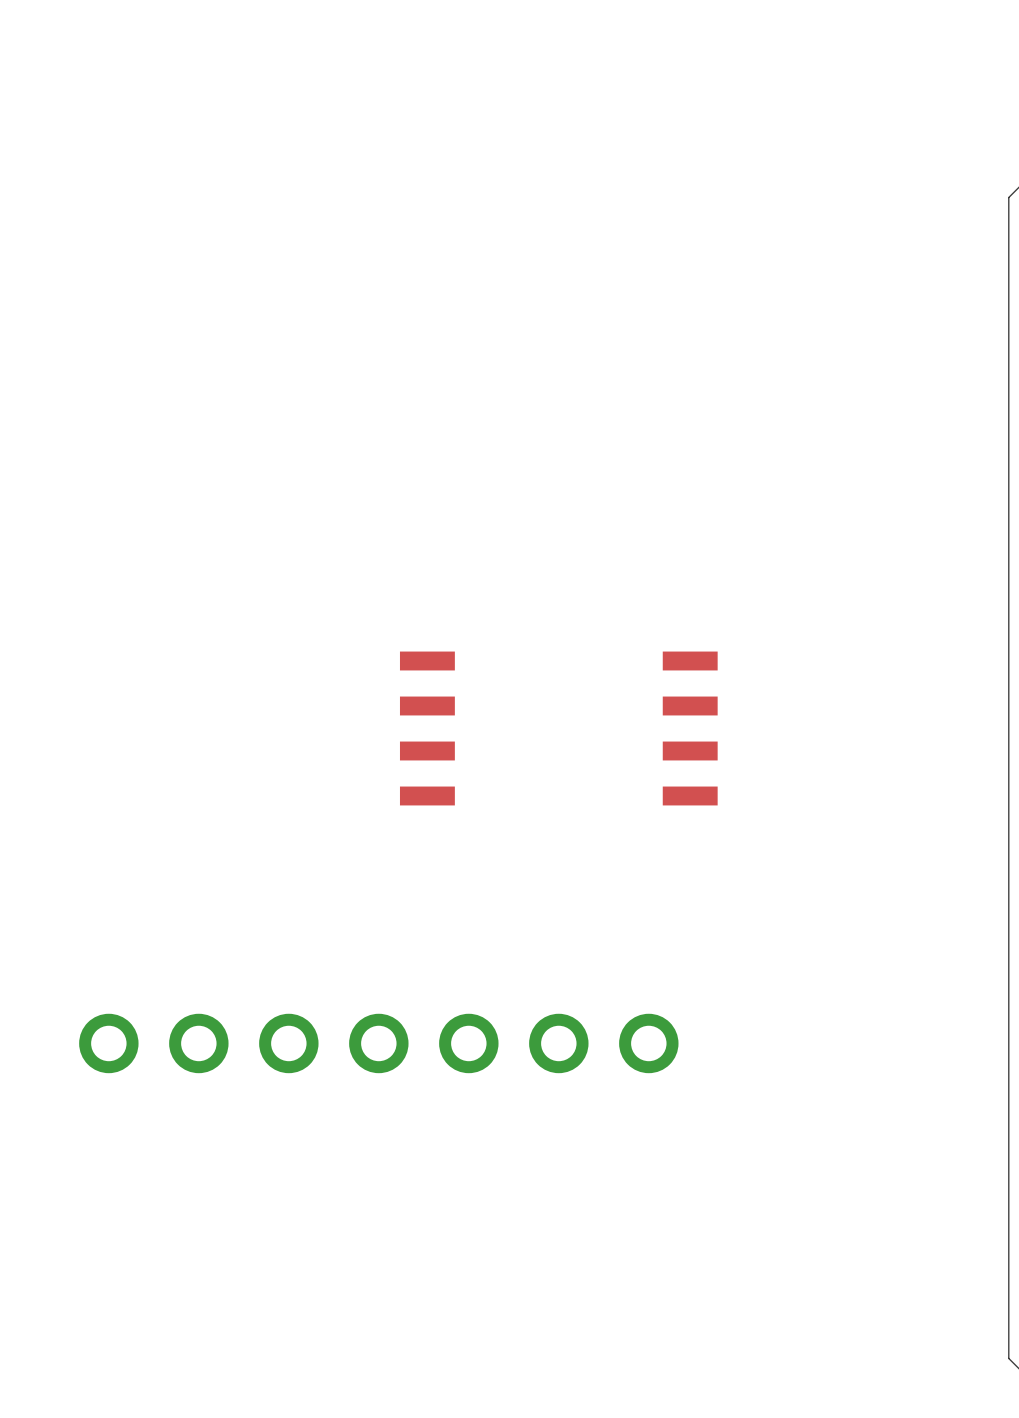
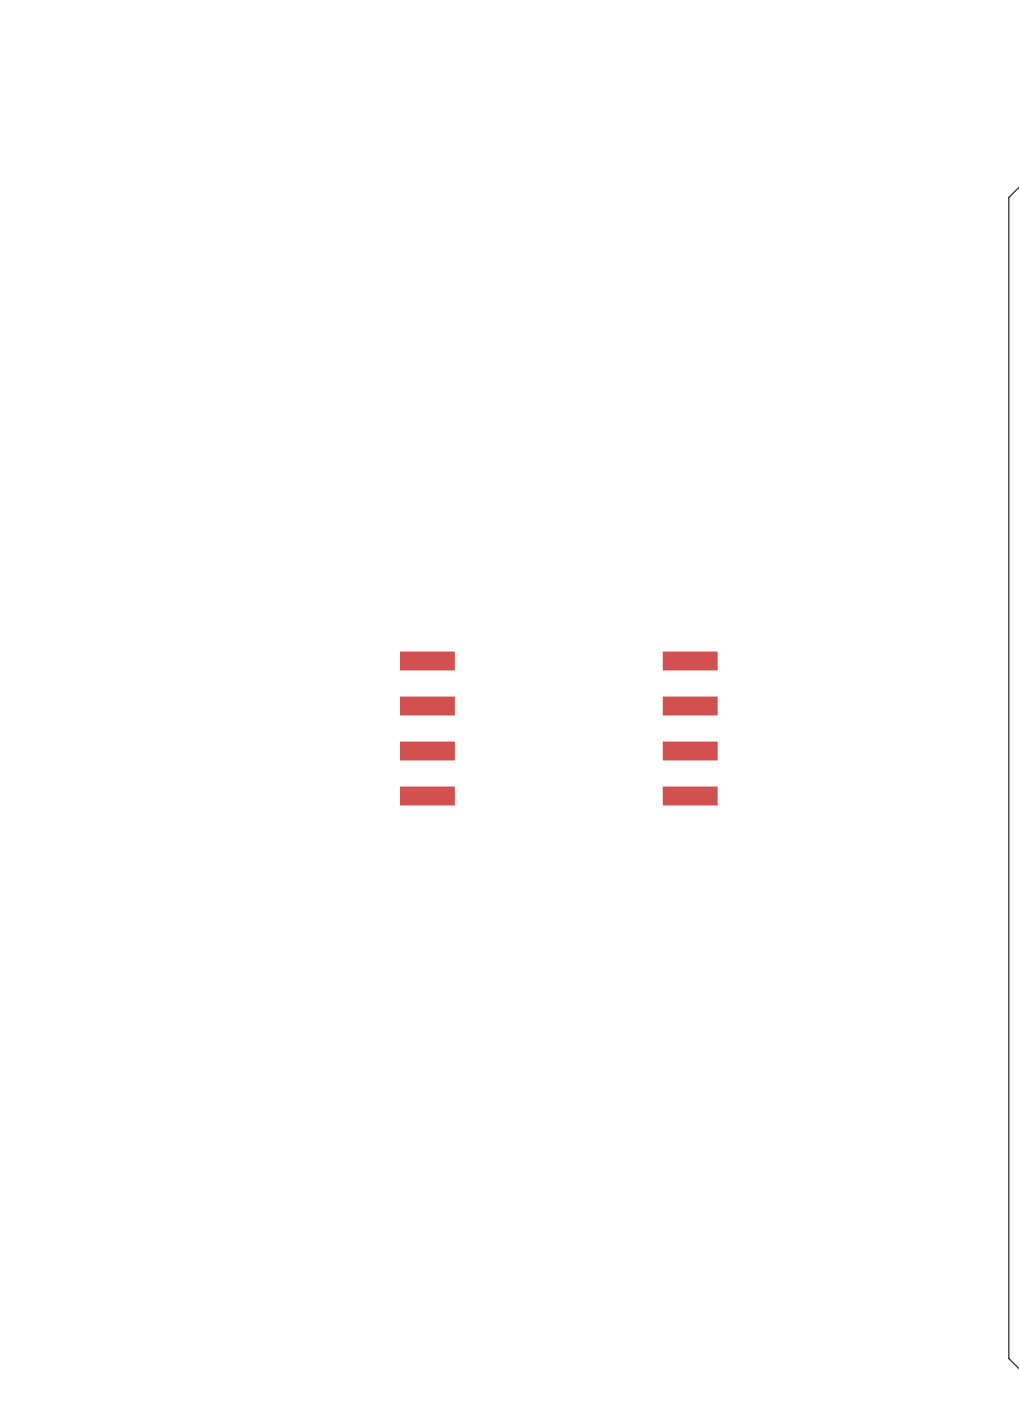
part: (378, 1043) -> none

